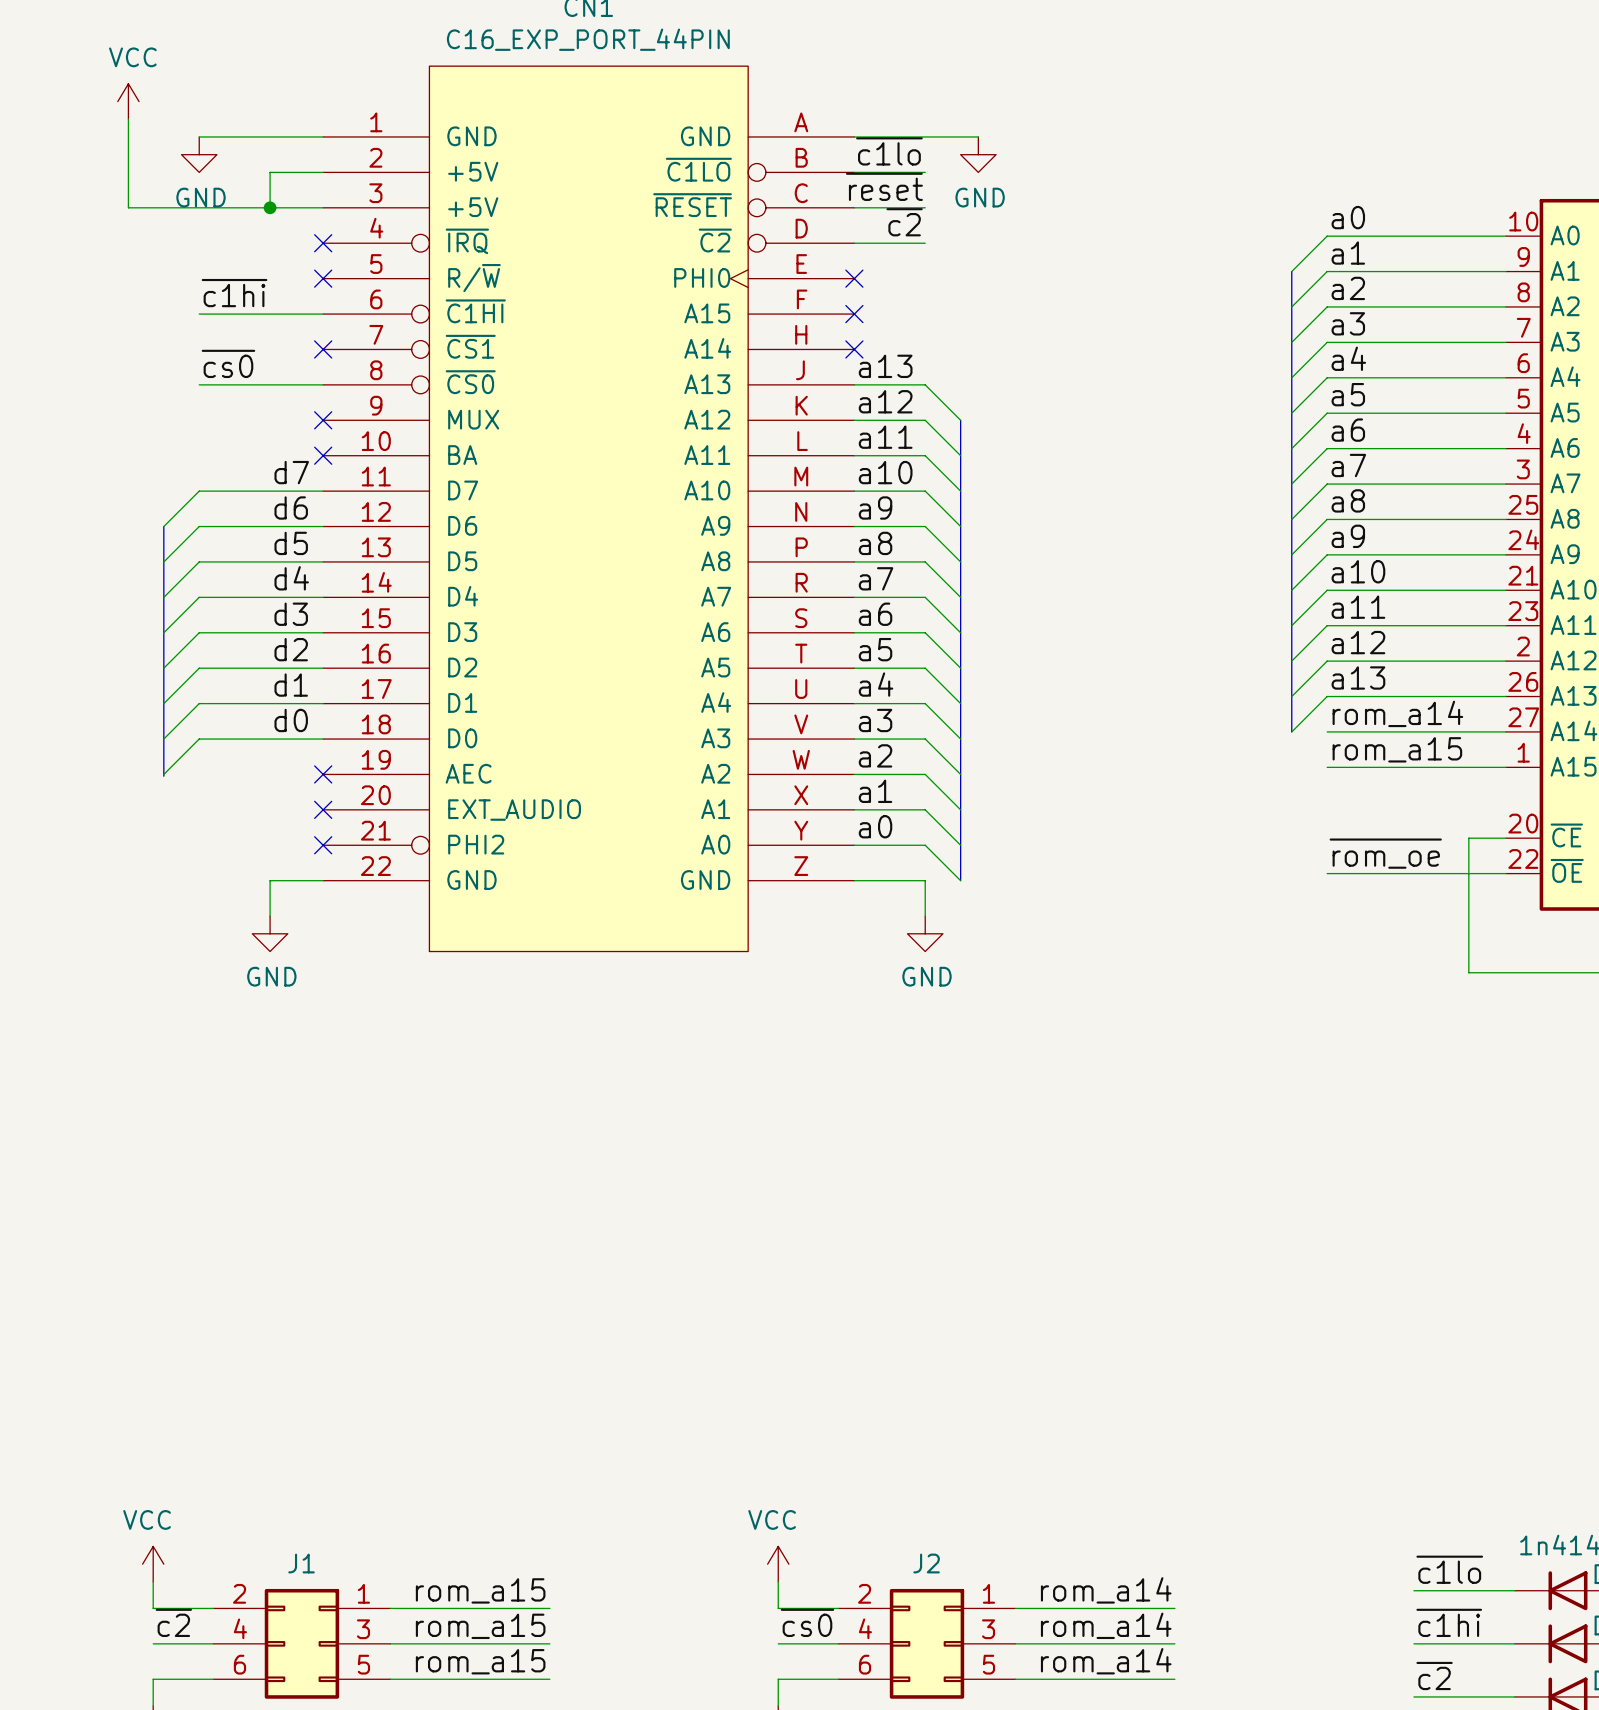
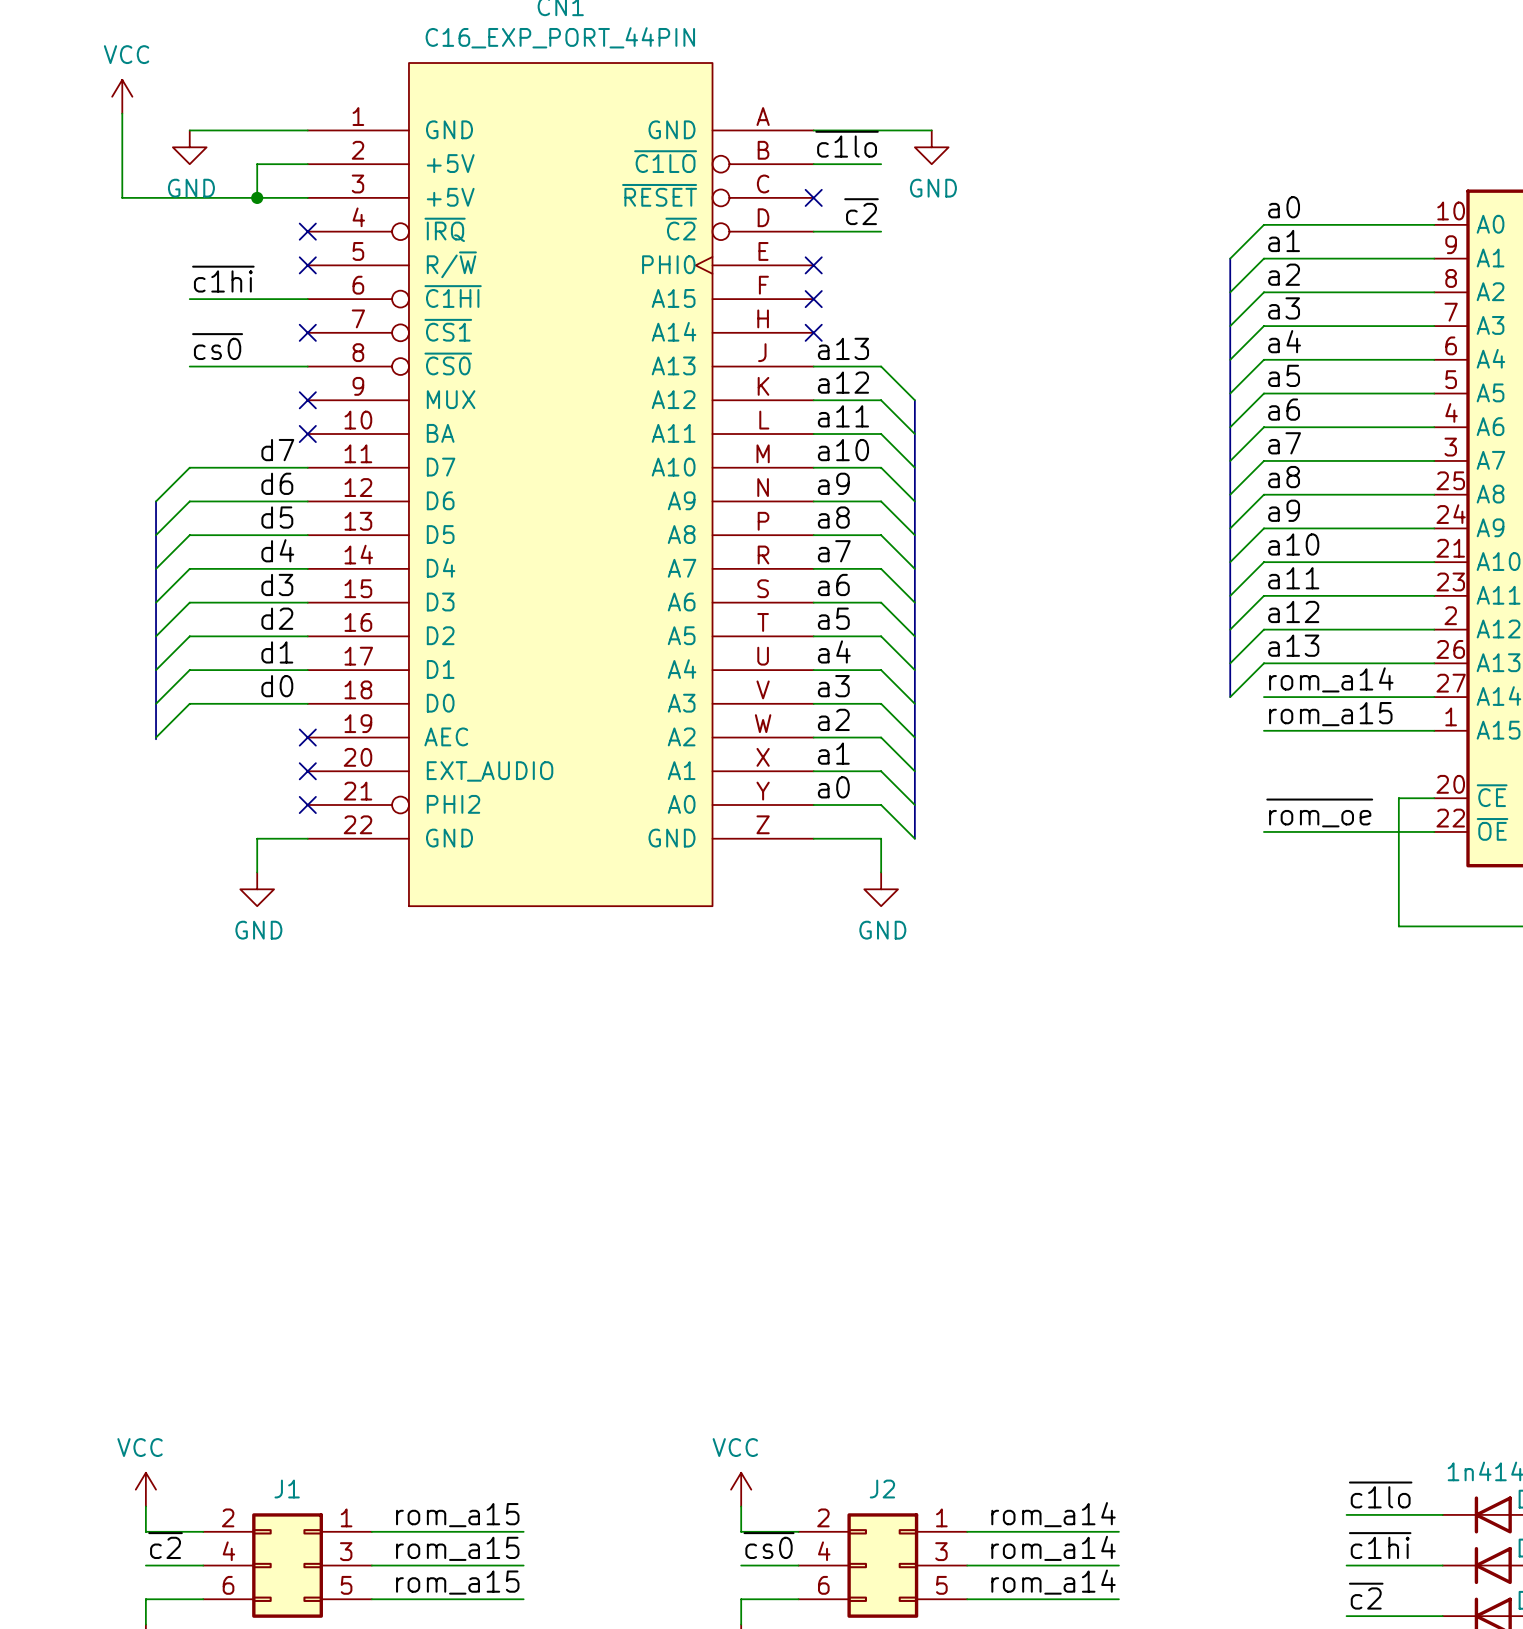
label: ~{reset} (884, 186) -> none
wire: (854, 207) (925, 207) -> none
no-connect mark: none -> (813, 197)

